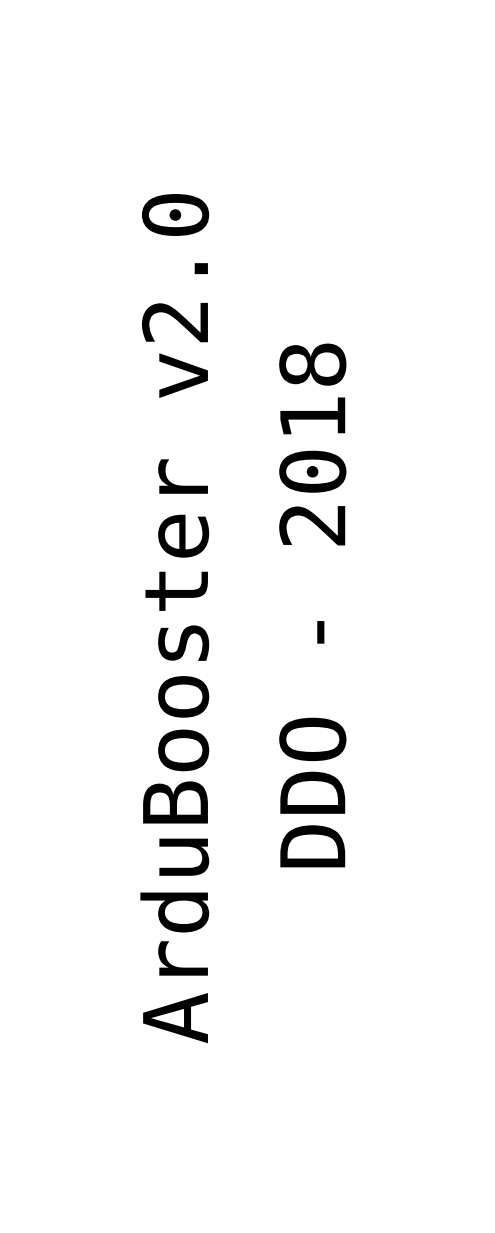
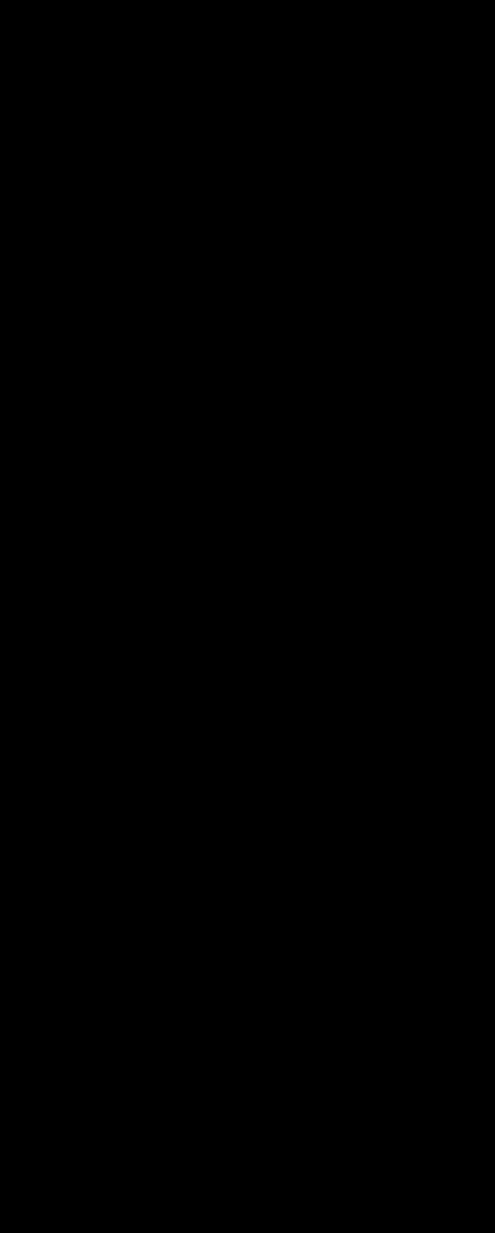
text: DDO - 2018 (312, 605) -> none
text: ArduBooster v2.0 (174, 618) -> none

